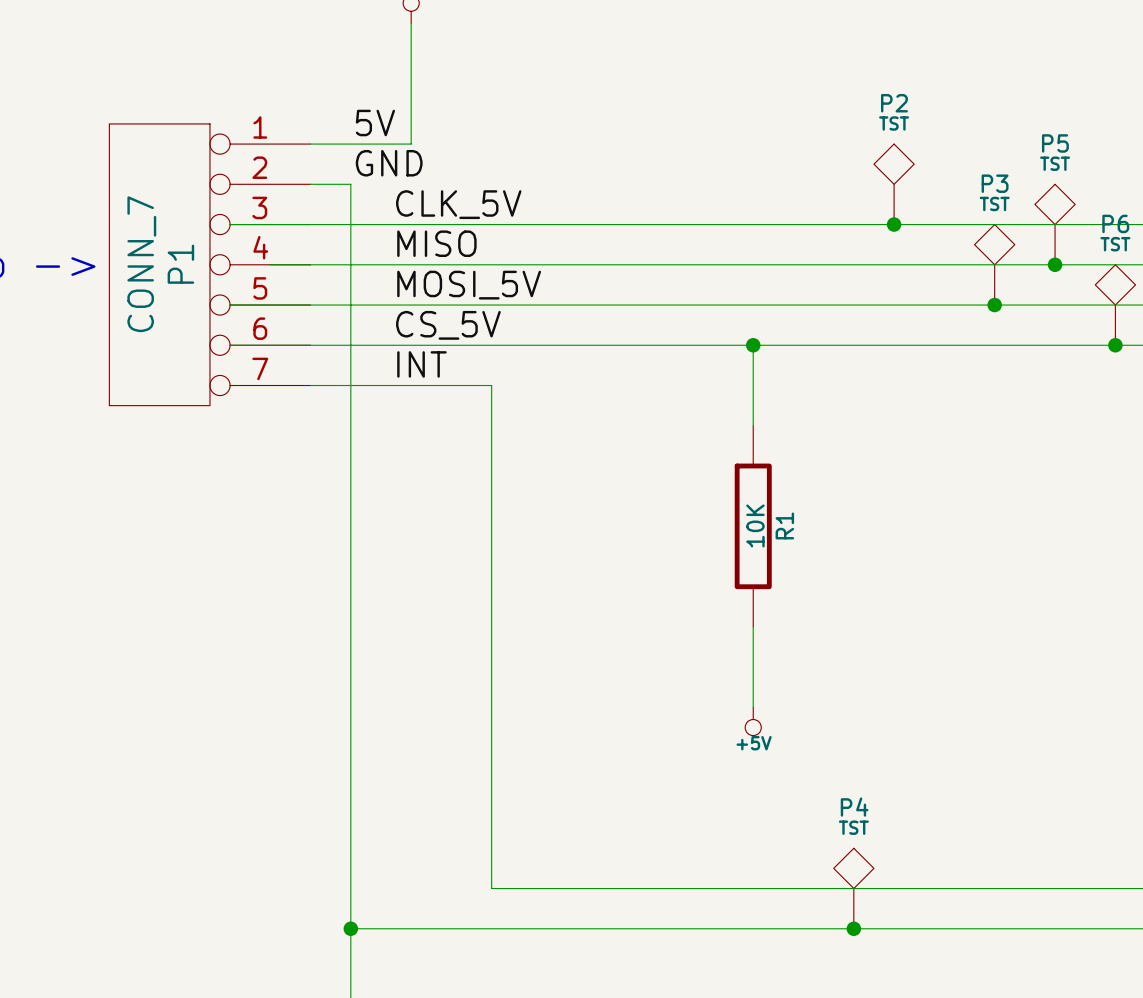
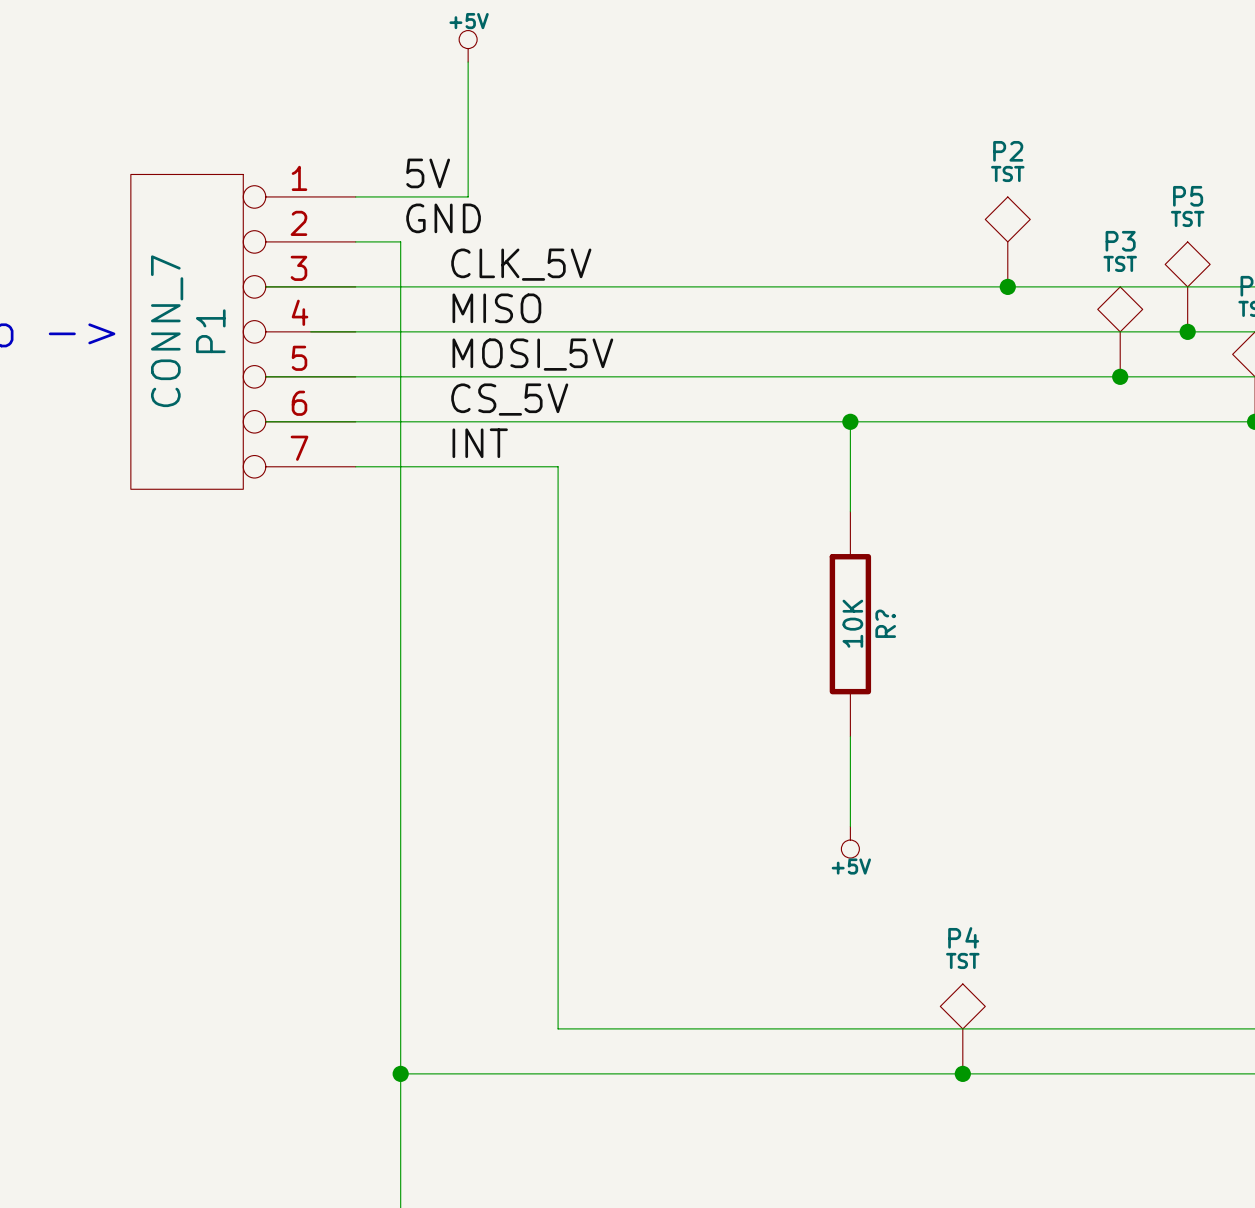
R1 name: R1 (784, 525) -> R? (885, 623)

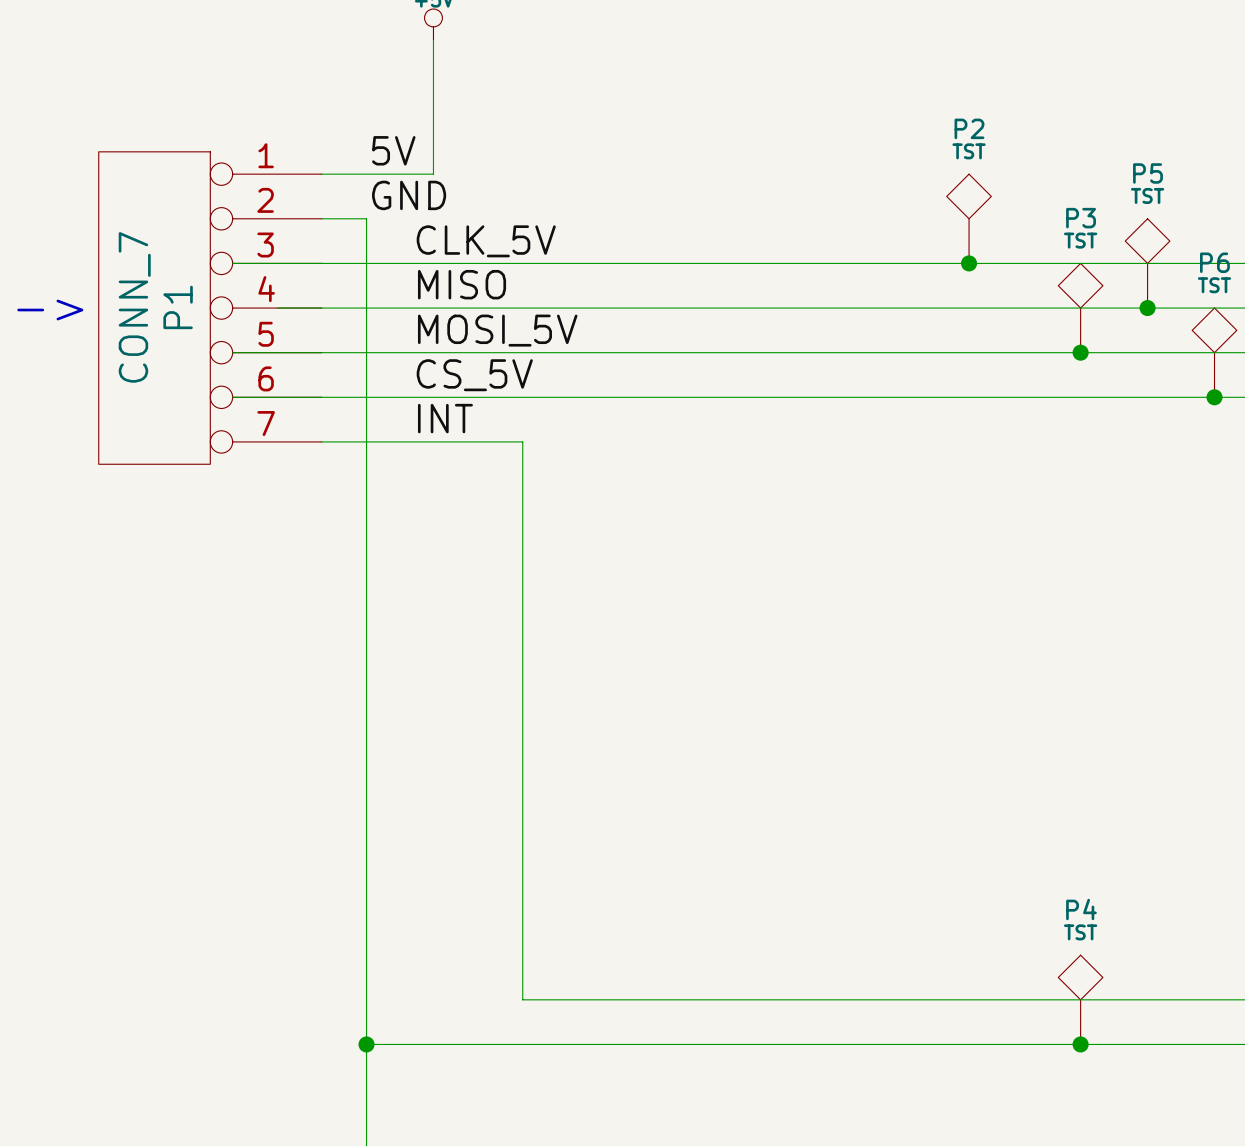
wire: (850, 421) (850, 511) -> none
junction: (850, 421) -> none
R?: 10K (850, 624) -> none
wire: (850, 736) (850, 826) -> none
power symbol: +5V (850, 842) -> none
P4 position: (962, 1028) -> (1080, 999)
junction: (962, 1073) -> none
junction: none -> (1080, 1044)

